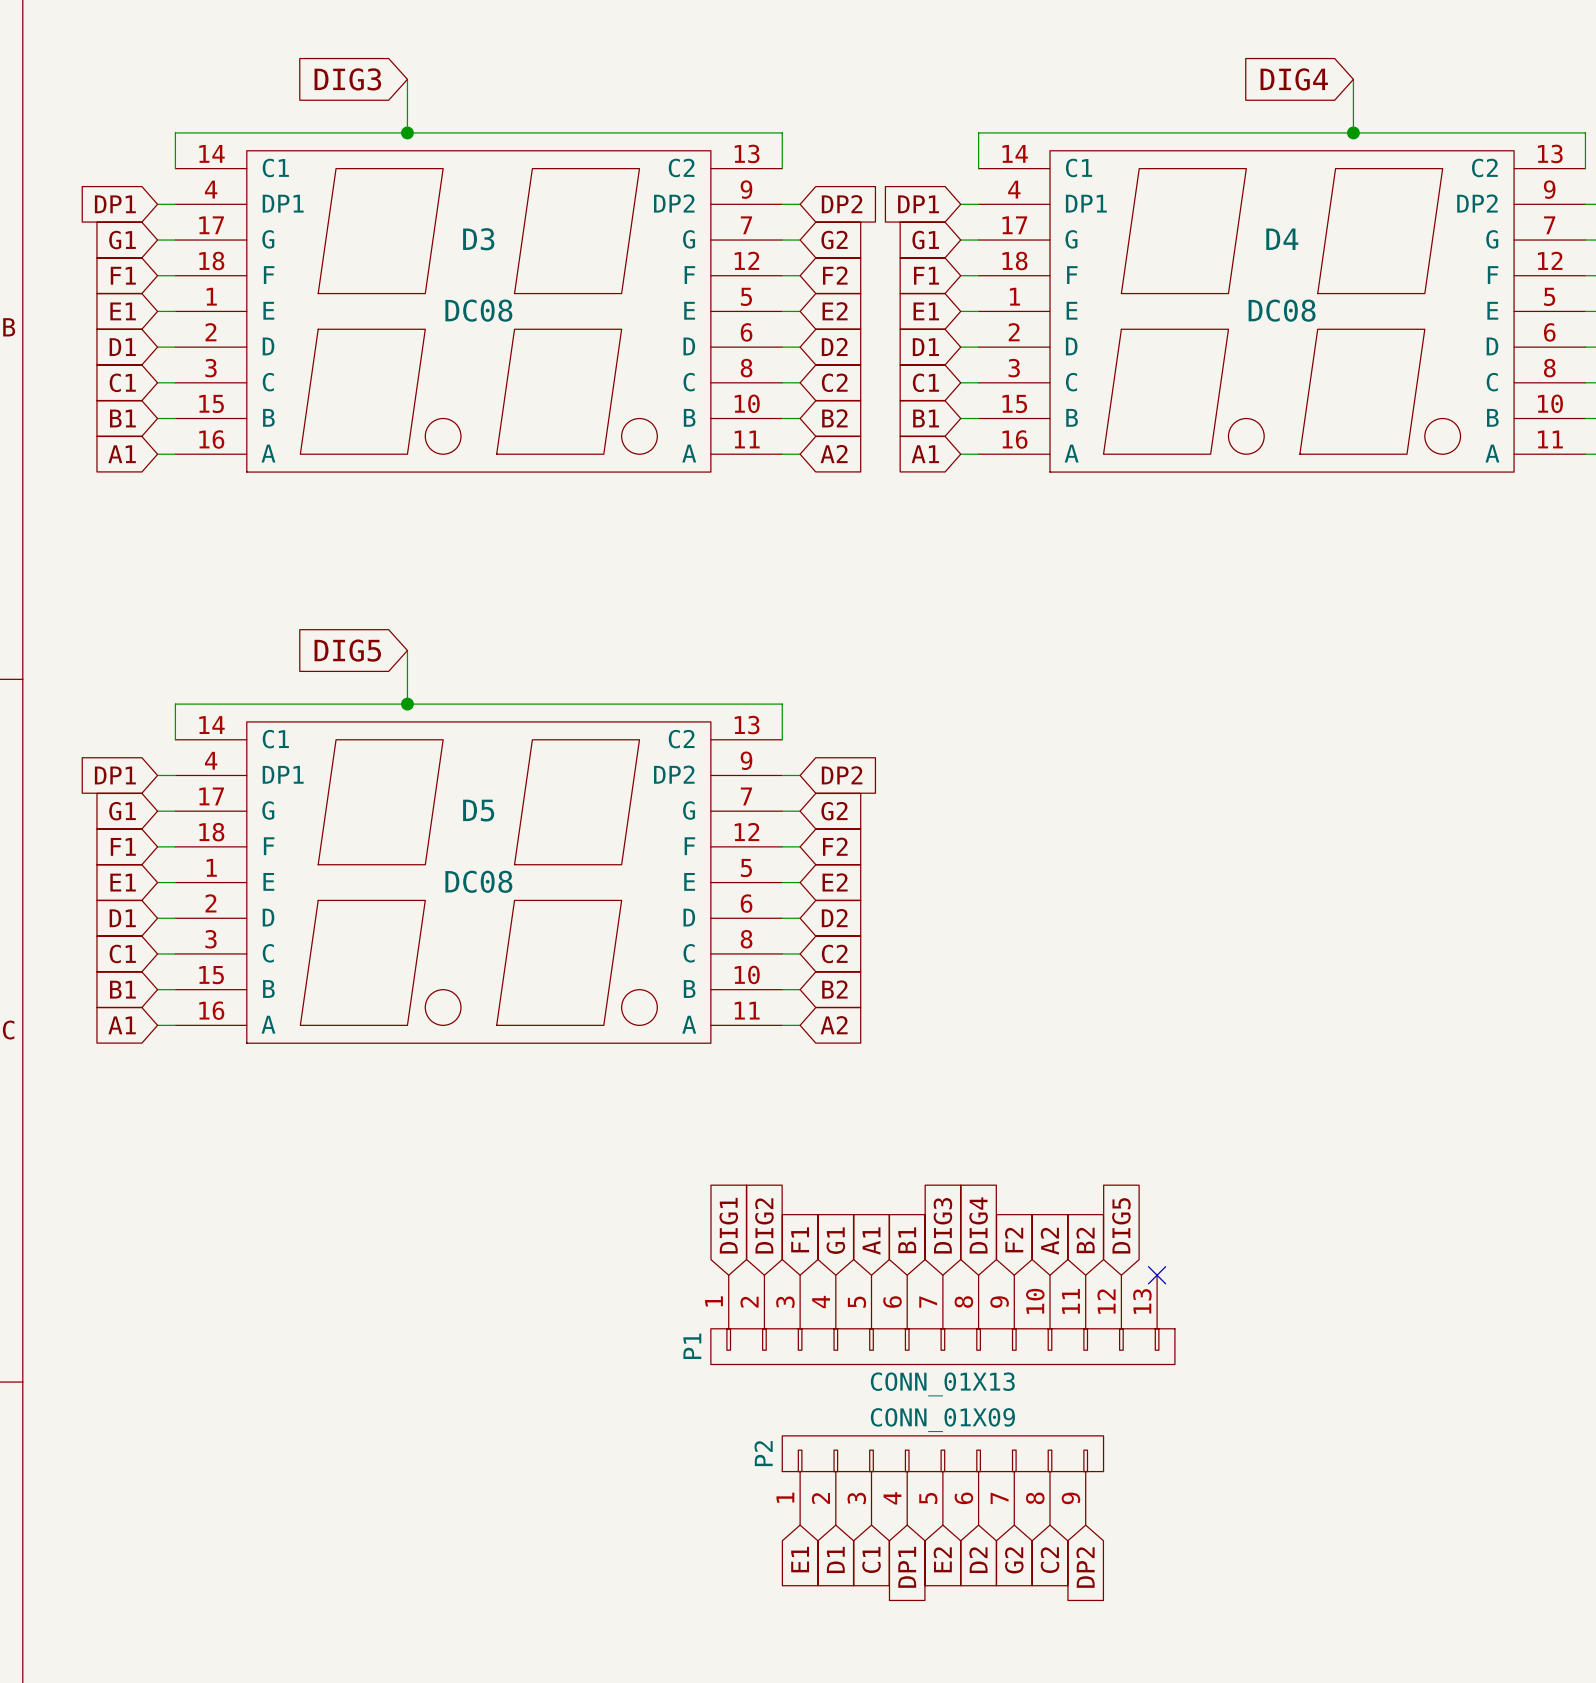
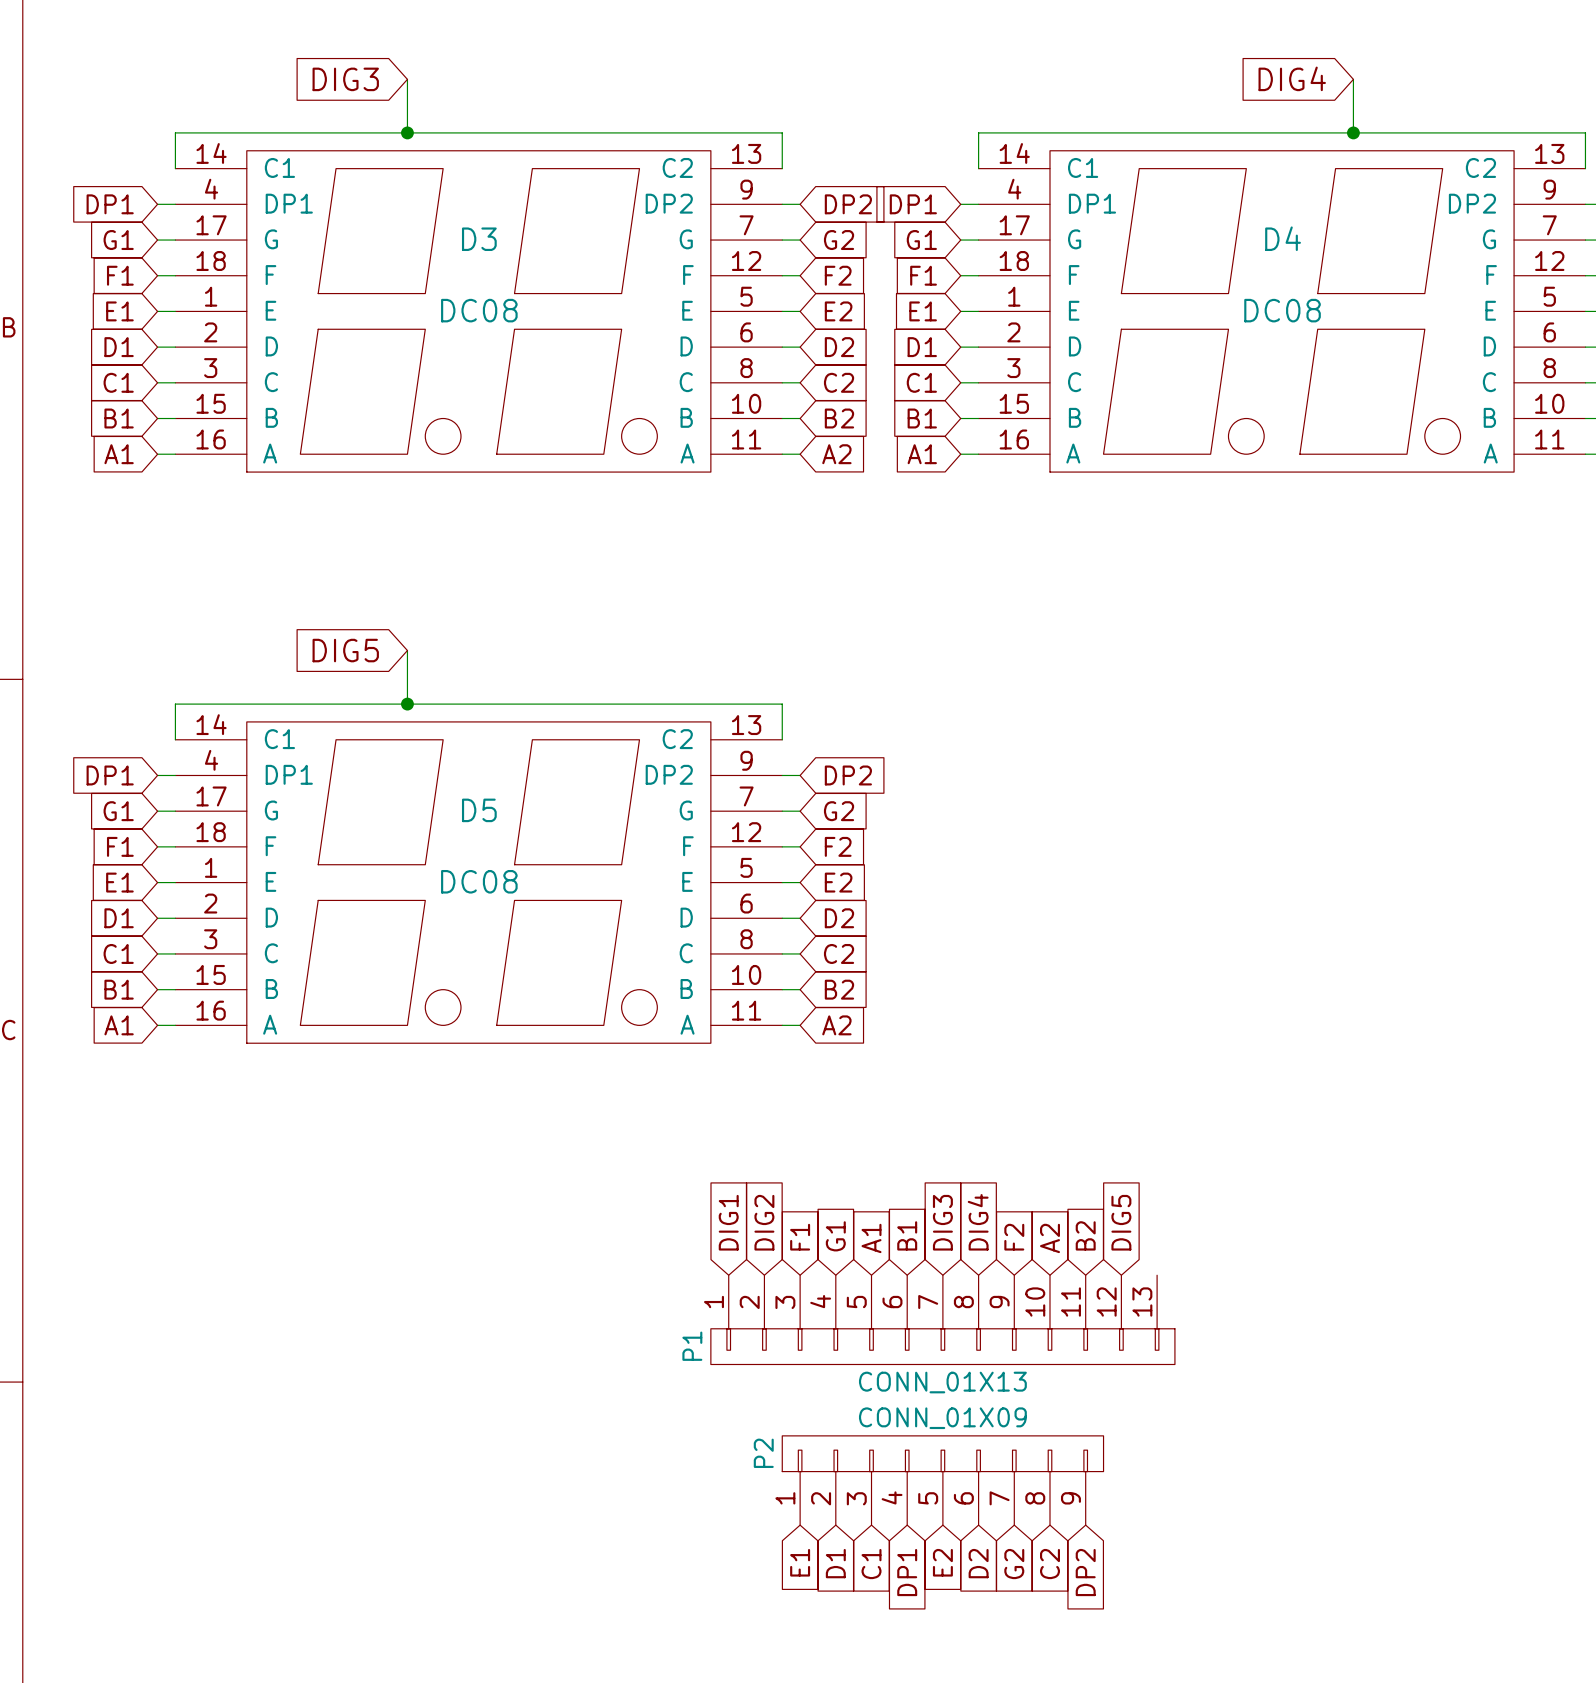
no-connect mark: (1157, 1275) -> none

